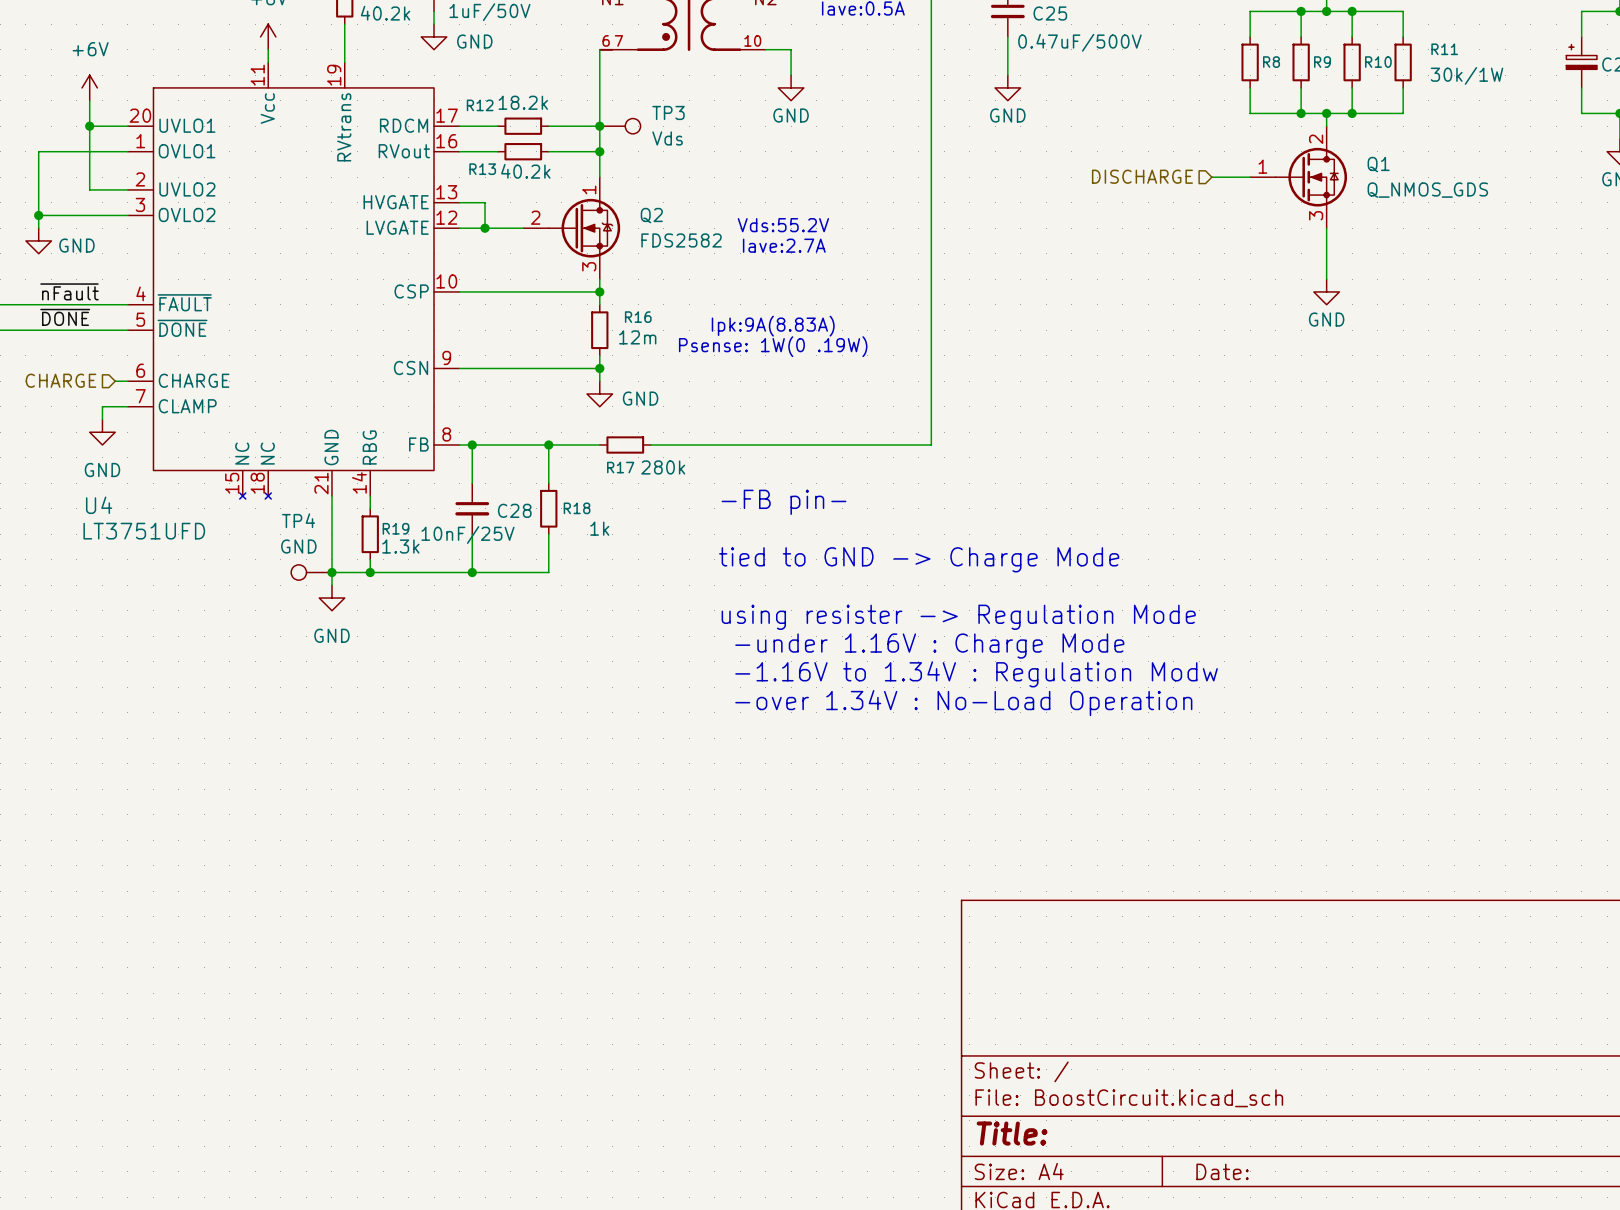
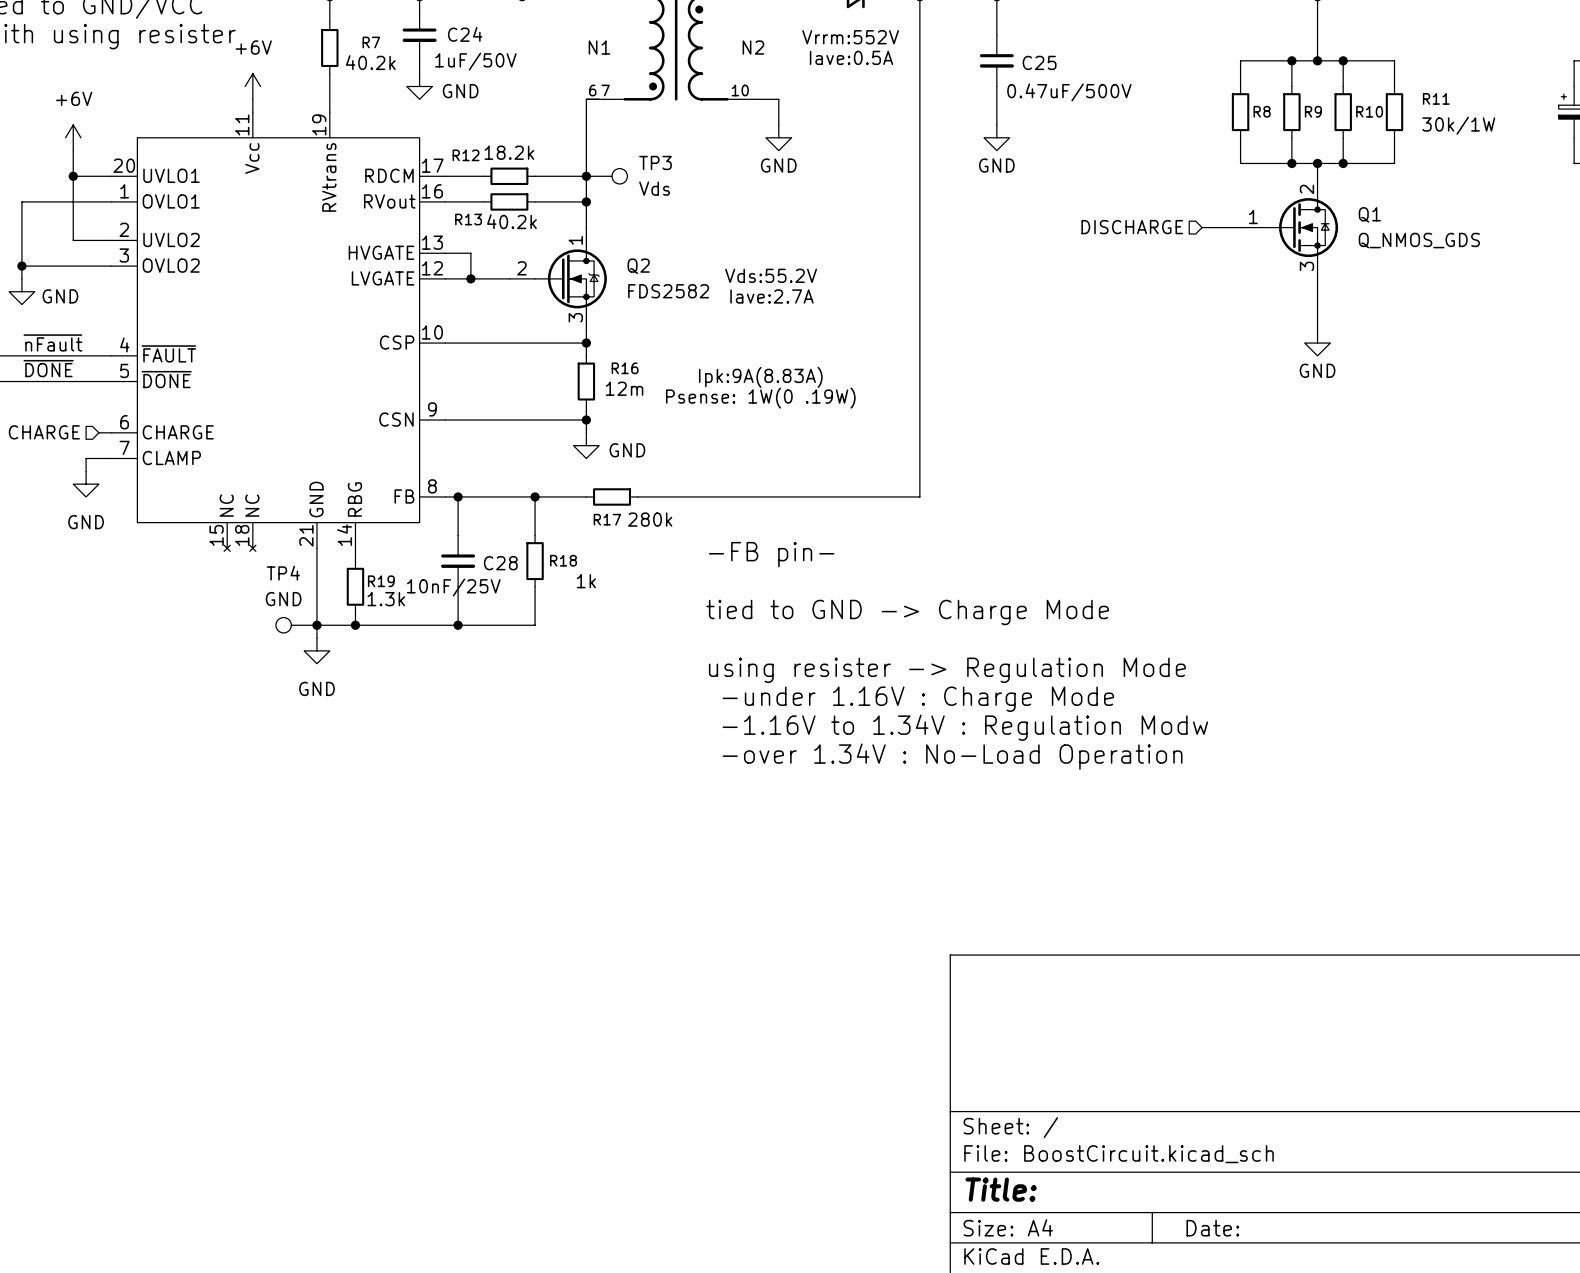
U4 name: U4 (99, 505) -> none
U4 value: LT3751UFD (144, 531) -> none

